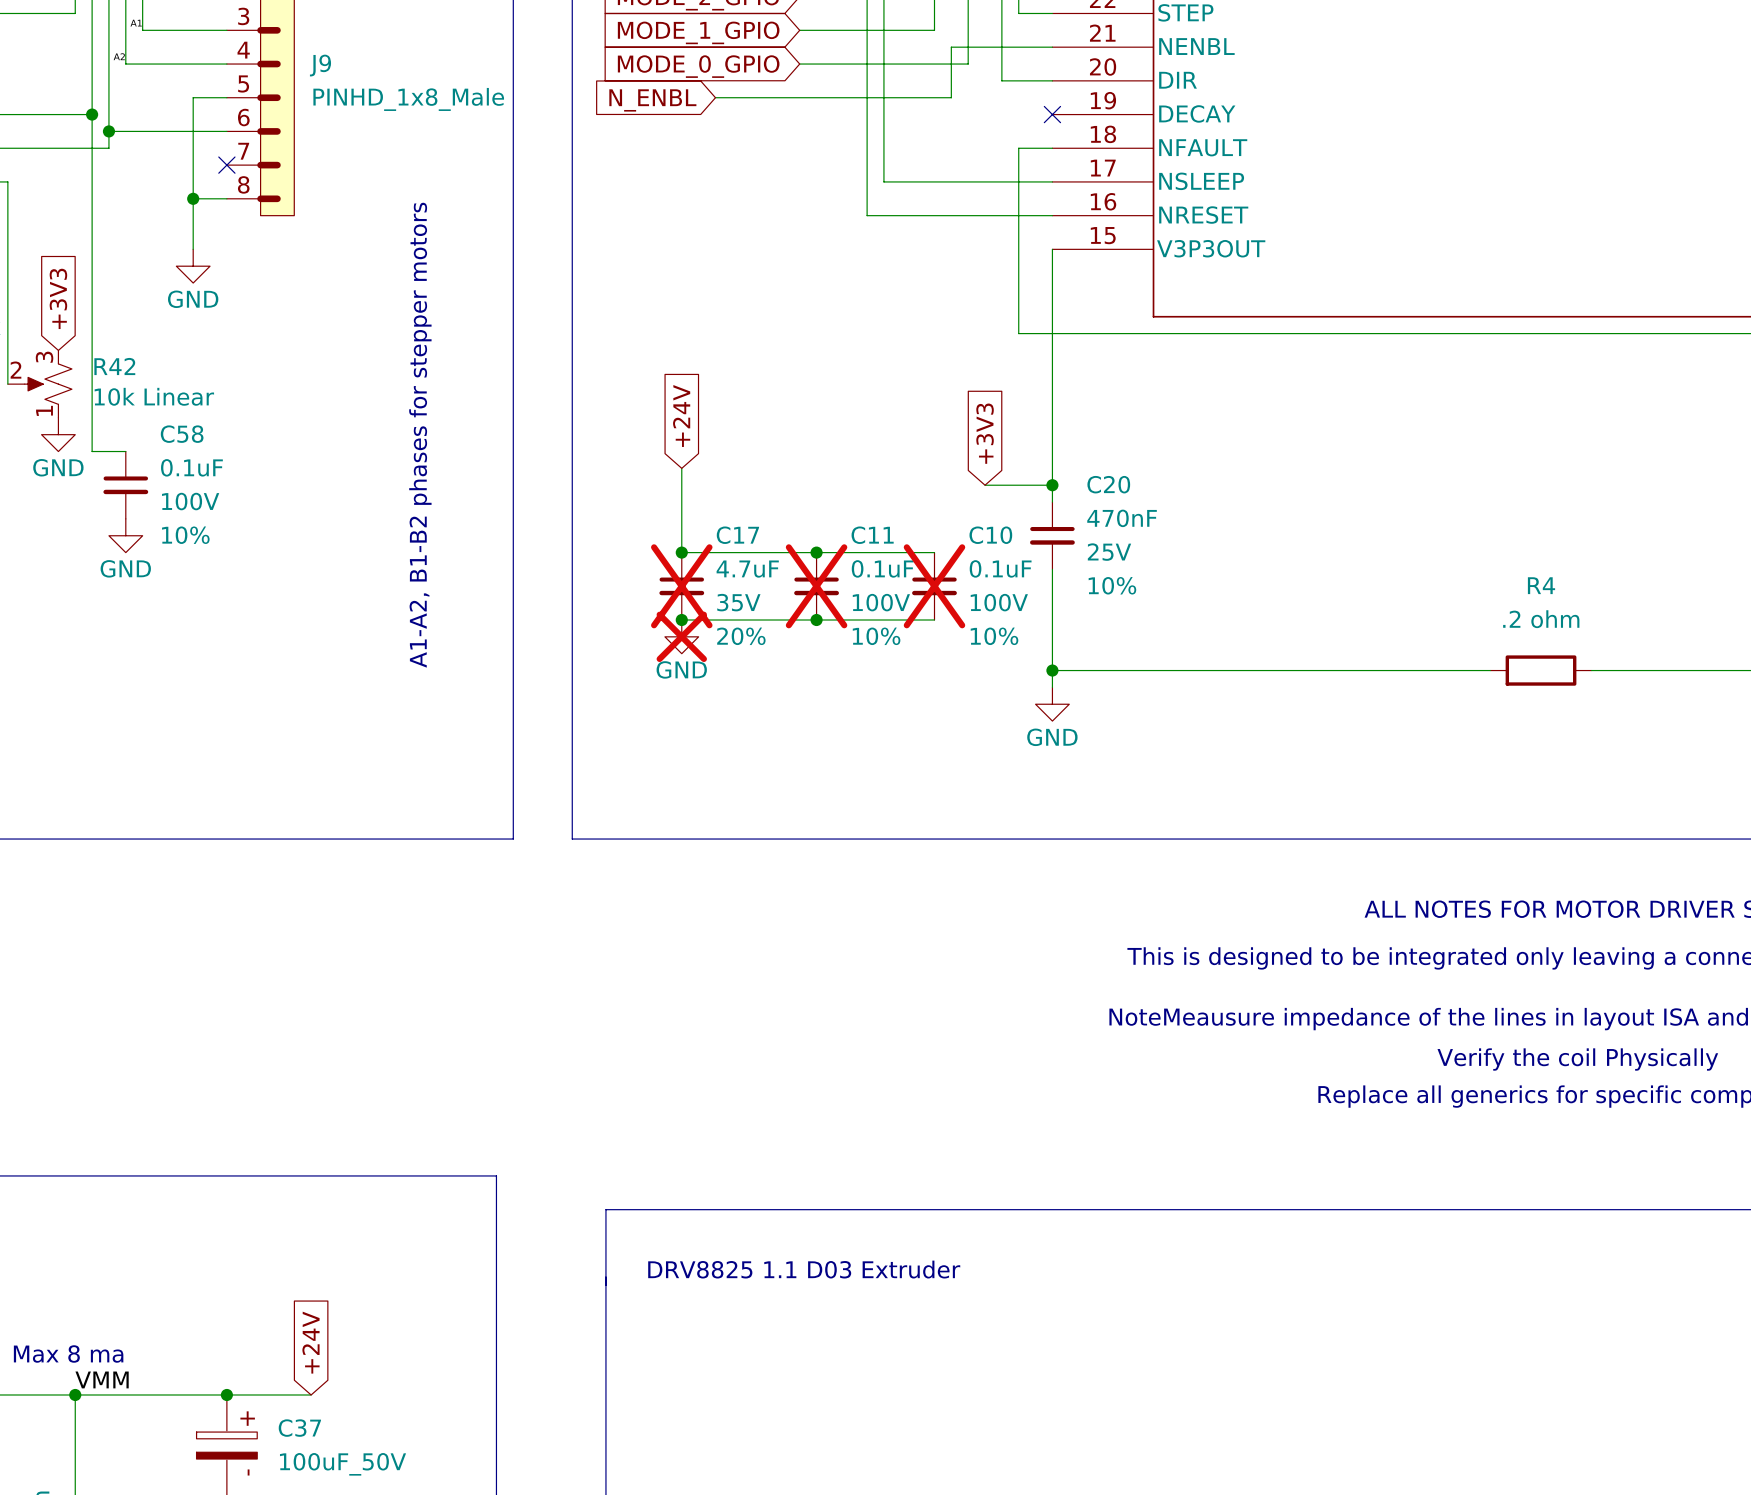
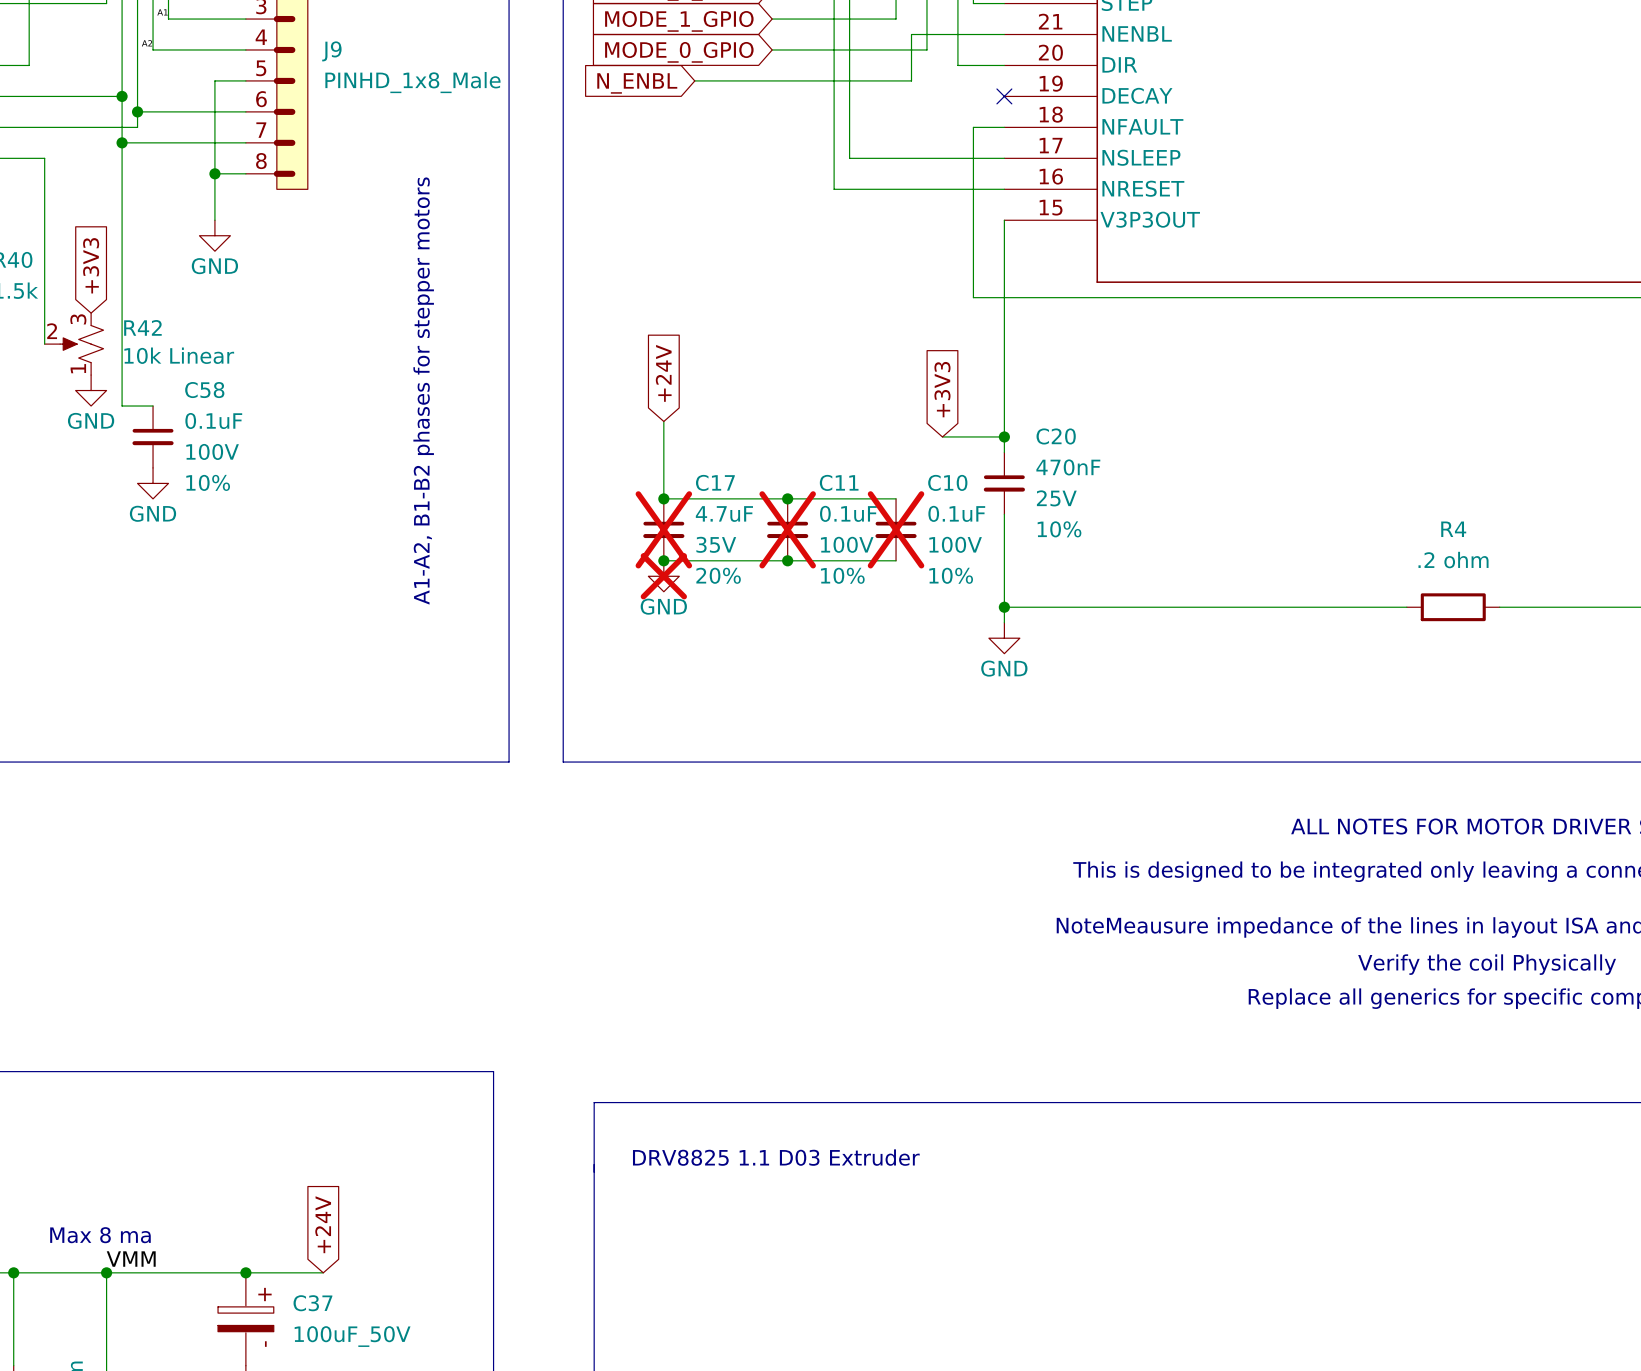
wire: none -> (122, 142) (245, 142)
junction: none -> (122, 142)
no-connect mark: (226, 165) -> none

